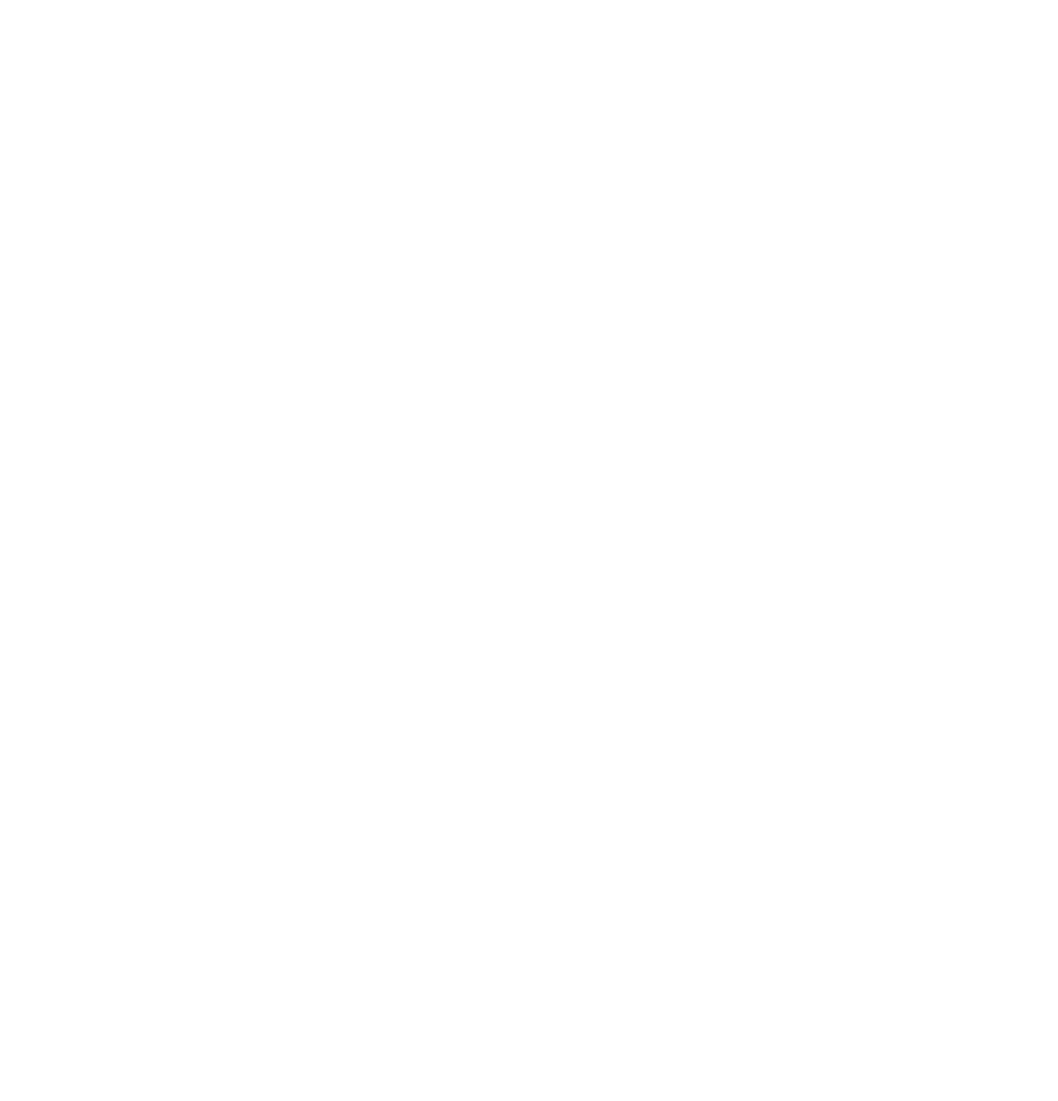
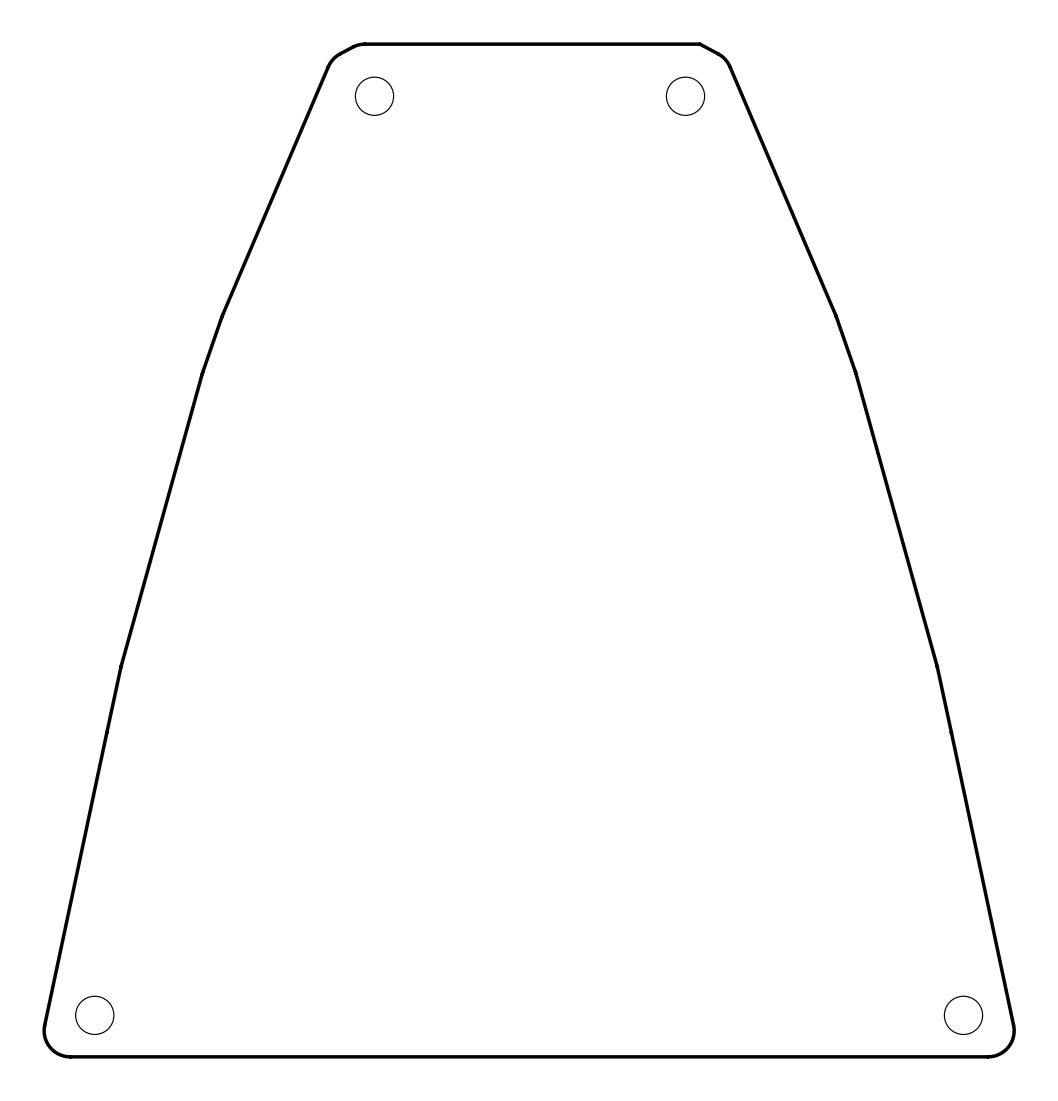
board edge: none -> (699, 44) (364, 44) (355, 45) (340, 53) (329, 64) (221, 316) (202, 373) (121, 665) (44, 1025) (46, 1041) (57, 1053) (70, 1056) (988, 1056) (1000, 1053) (1010, 1044) (1013, 1035) (1013, 1025) (937, 667) (855, 372) (835, 315) (729, 66) (720, 55) (699, 44)
round board edge: none -> [354, 76, 395, 116]
round board edge: none -> [665, 76, 706, 116]
round board edge: none -> [75, 995, 115, 1035]
round board edge: none -> [943, 995, 984, 1035]

